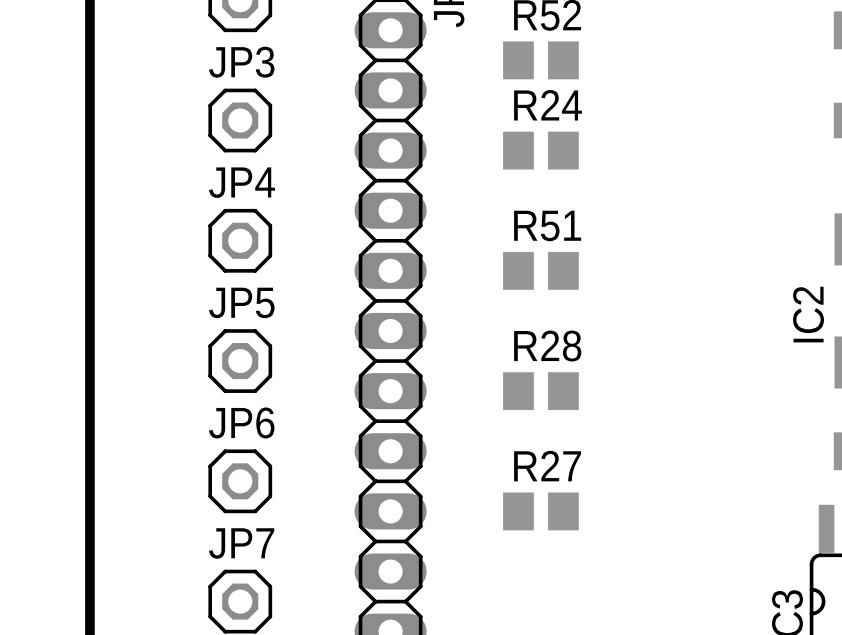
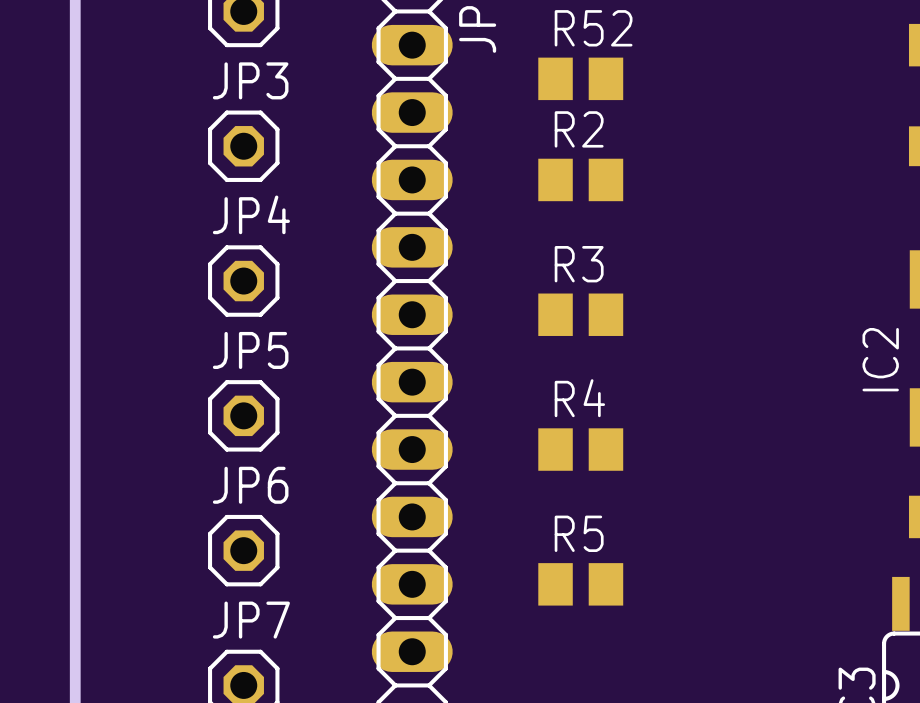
R24 name: R24 (547, 105) -> R2 (579, 129)
R51 name: R51 (547, 225) -> R3 (579, 264)
R28 name: R28 (547, 346) -> R4 (579, 398)
R27 name: R27 (547, 466) -> R5 (579, 533)

